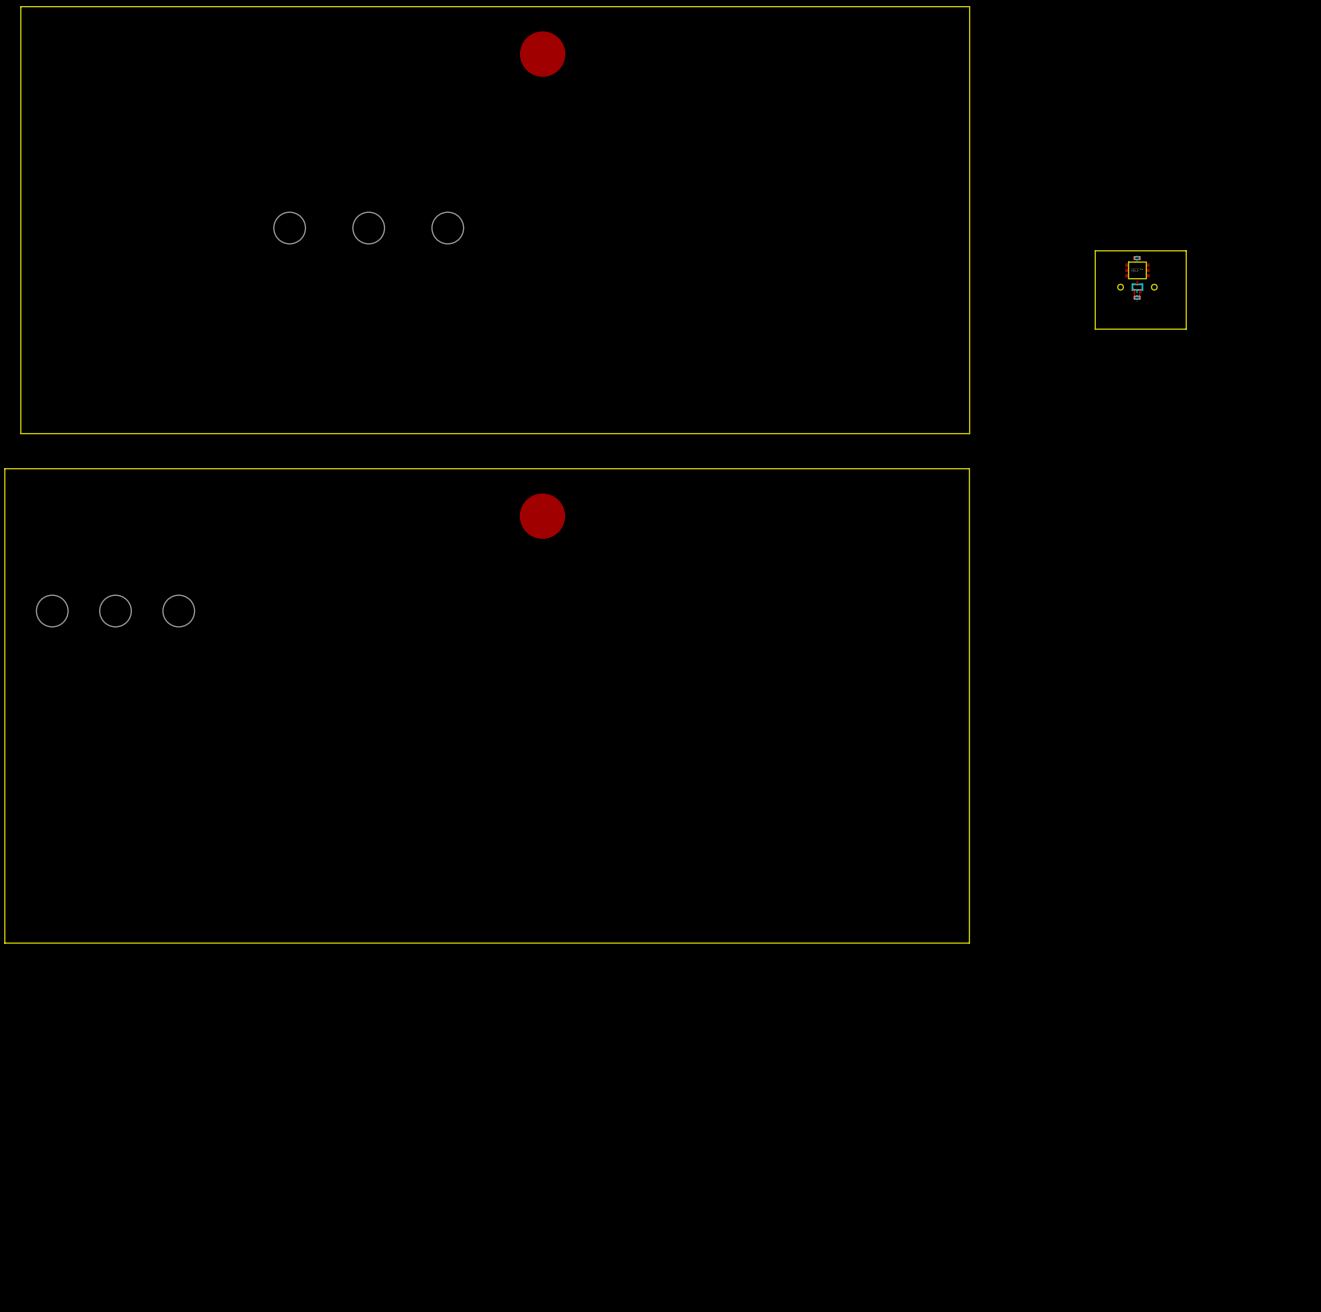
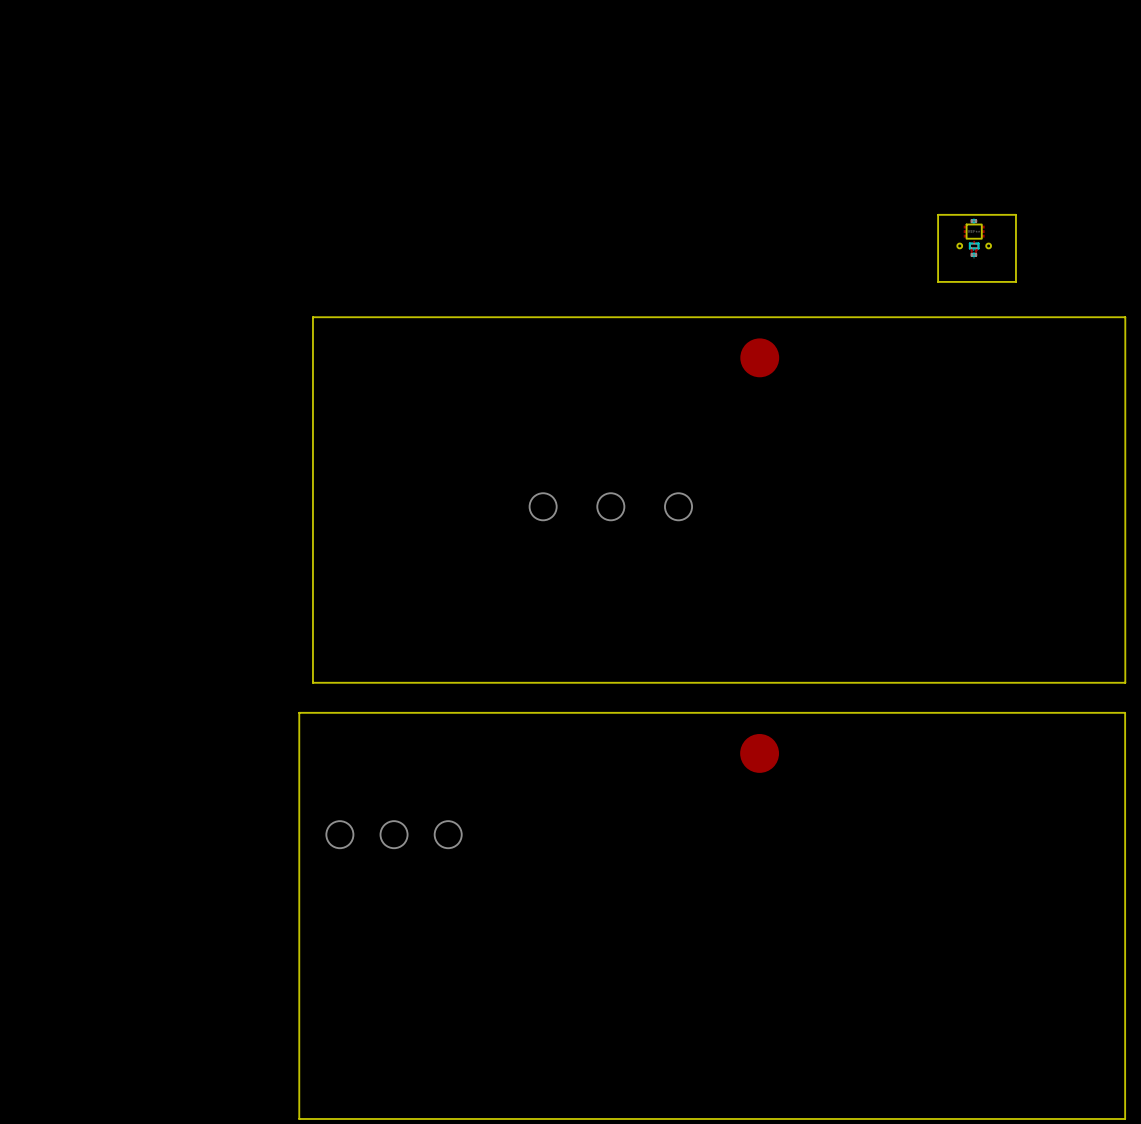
board edge: (20, 6) (969, 6) (969, 433) (20, 433) (20, 6) -> none
drawing: [519, 31, 566, 77] -> none
drawing: [273, 211, 306, 245] -> none
drawing: [352, 211, 385, 245] -> none
drawing: [431, 211, 464, 245] -> none
board edge: none -> (312, 317) (1125, 317) (1125, 682) (312, 682) (312, 317)
drawing: none -> [740, 338, 780, 378]
board edge: (4, 468) (969, 468) (969, 943) (4, 943) (4, 468) -> none
drawing: [519, 493, 566, 539] -> none
drawing: none -> [529, 492, 557, 521]
drawing: none -> [597, 492, 625, 521]
drawing: none -> [664, 492, 693, 521]
drawing: [36, 594, 69, 628] -> none
drawing: [99, 594, 132, 628] -> none
drawing: [162, 594, 195, 628] -> none
board edge: none -> (299, 712) (1125, 712) (1125, 1118) (299, 1118) (299, 712)
drawing: none -> [740, 734, 780, 773]
drawing: none -> [326, 820, 354, 849]
drawing: none -> [380, 820, 408, 849]
drawing: none -> [434, 820, 463, 849]

